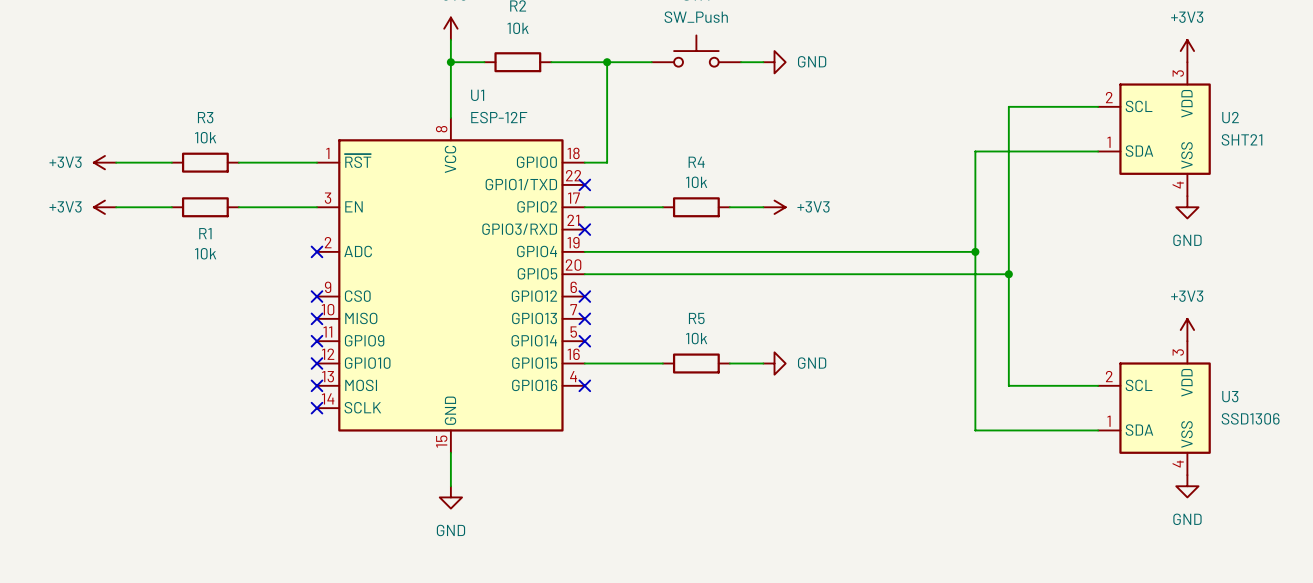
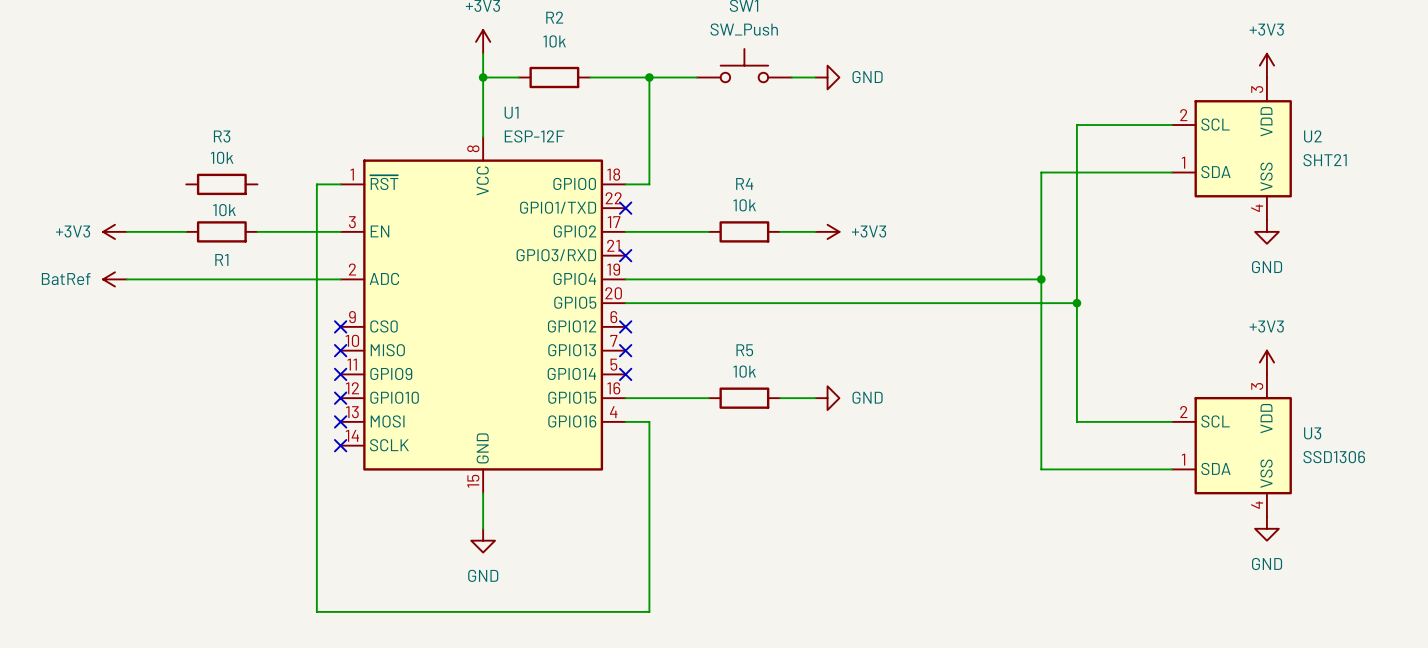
power symbol: +3V3 (104, 162) -> none
wire: (116, 162) (171, 162) -> none
wire: (238, 162) (294, 162) -> (625, 421) (649, 421) (649, 611) (316, 611) (316, 184)
power symbol: none -> BatRef (114, 279)
wire: none -> (126, 279) (340, 279)
no-connect mark: (316, 251) -> none
R1 value position: 10k (205, 253) -> 10k (224, 210)
no-connect mark: (584, 385) -> none

